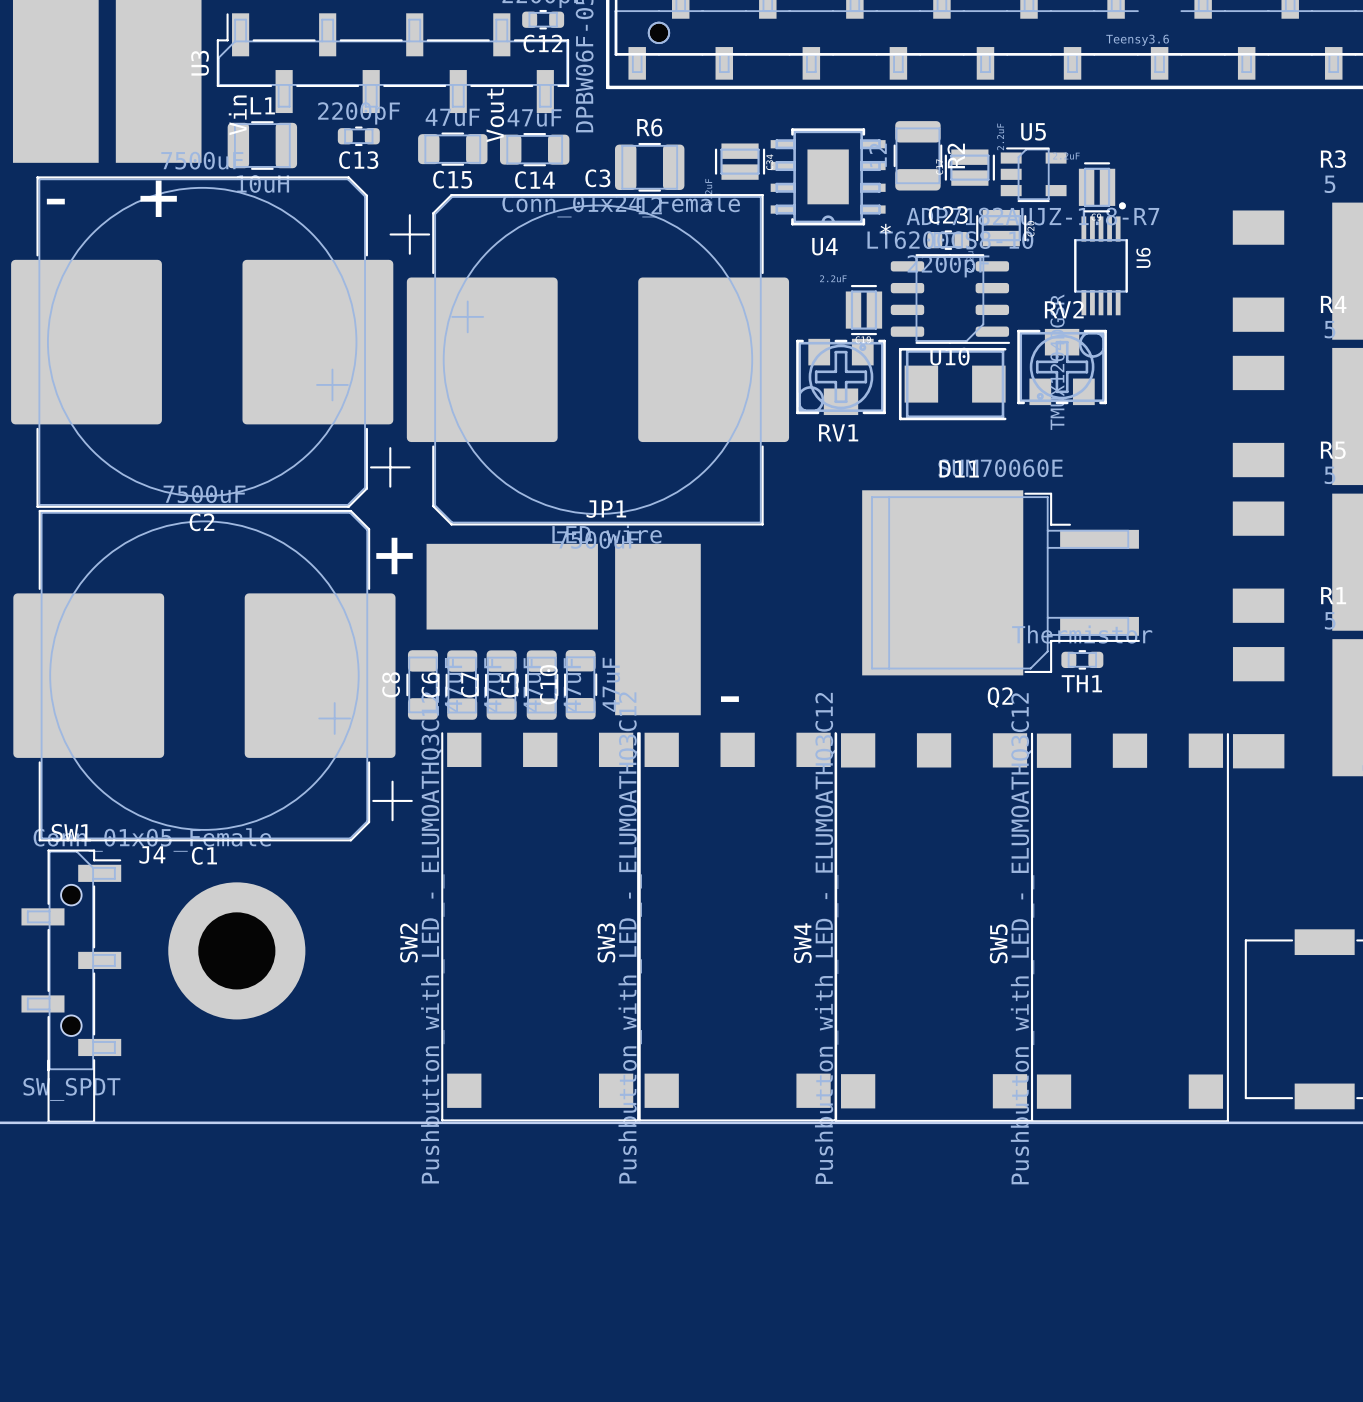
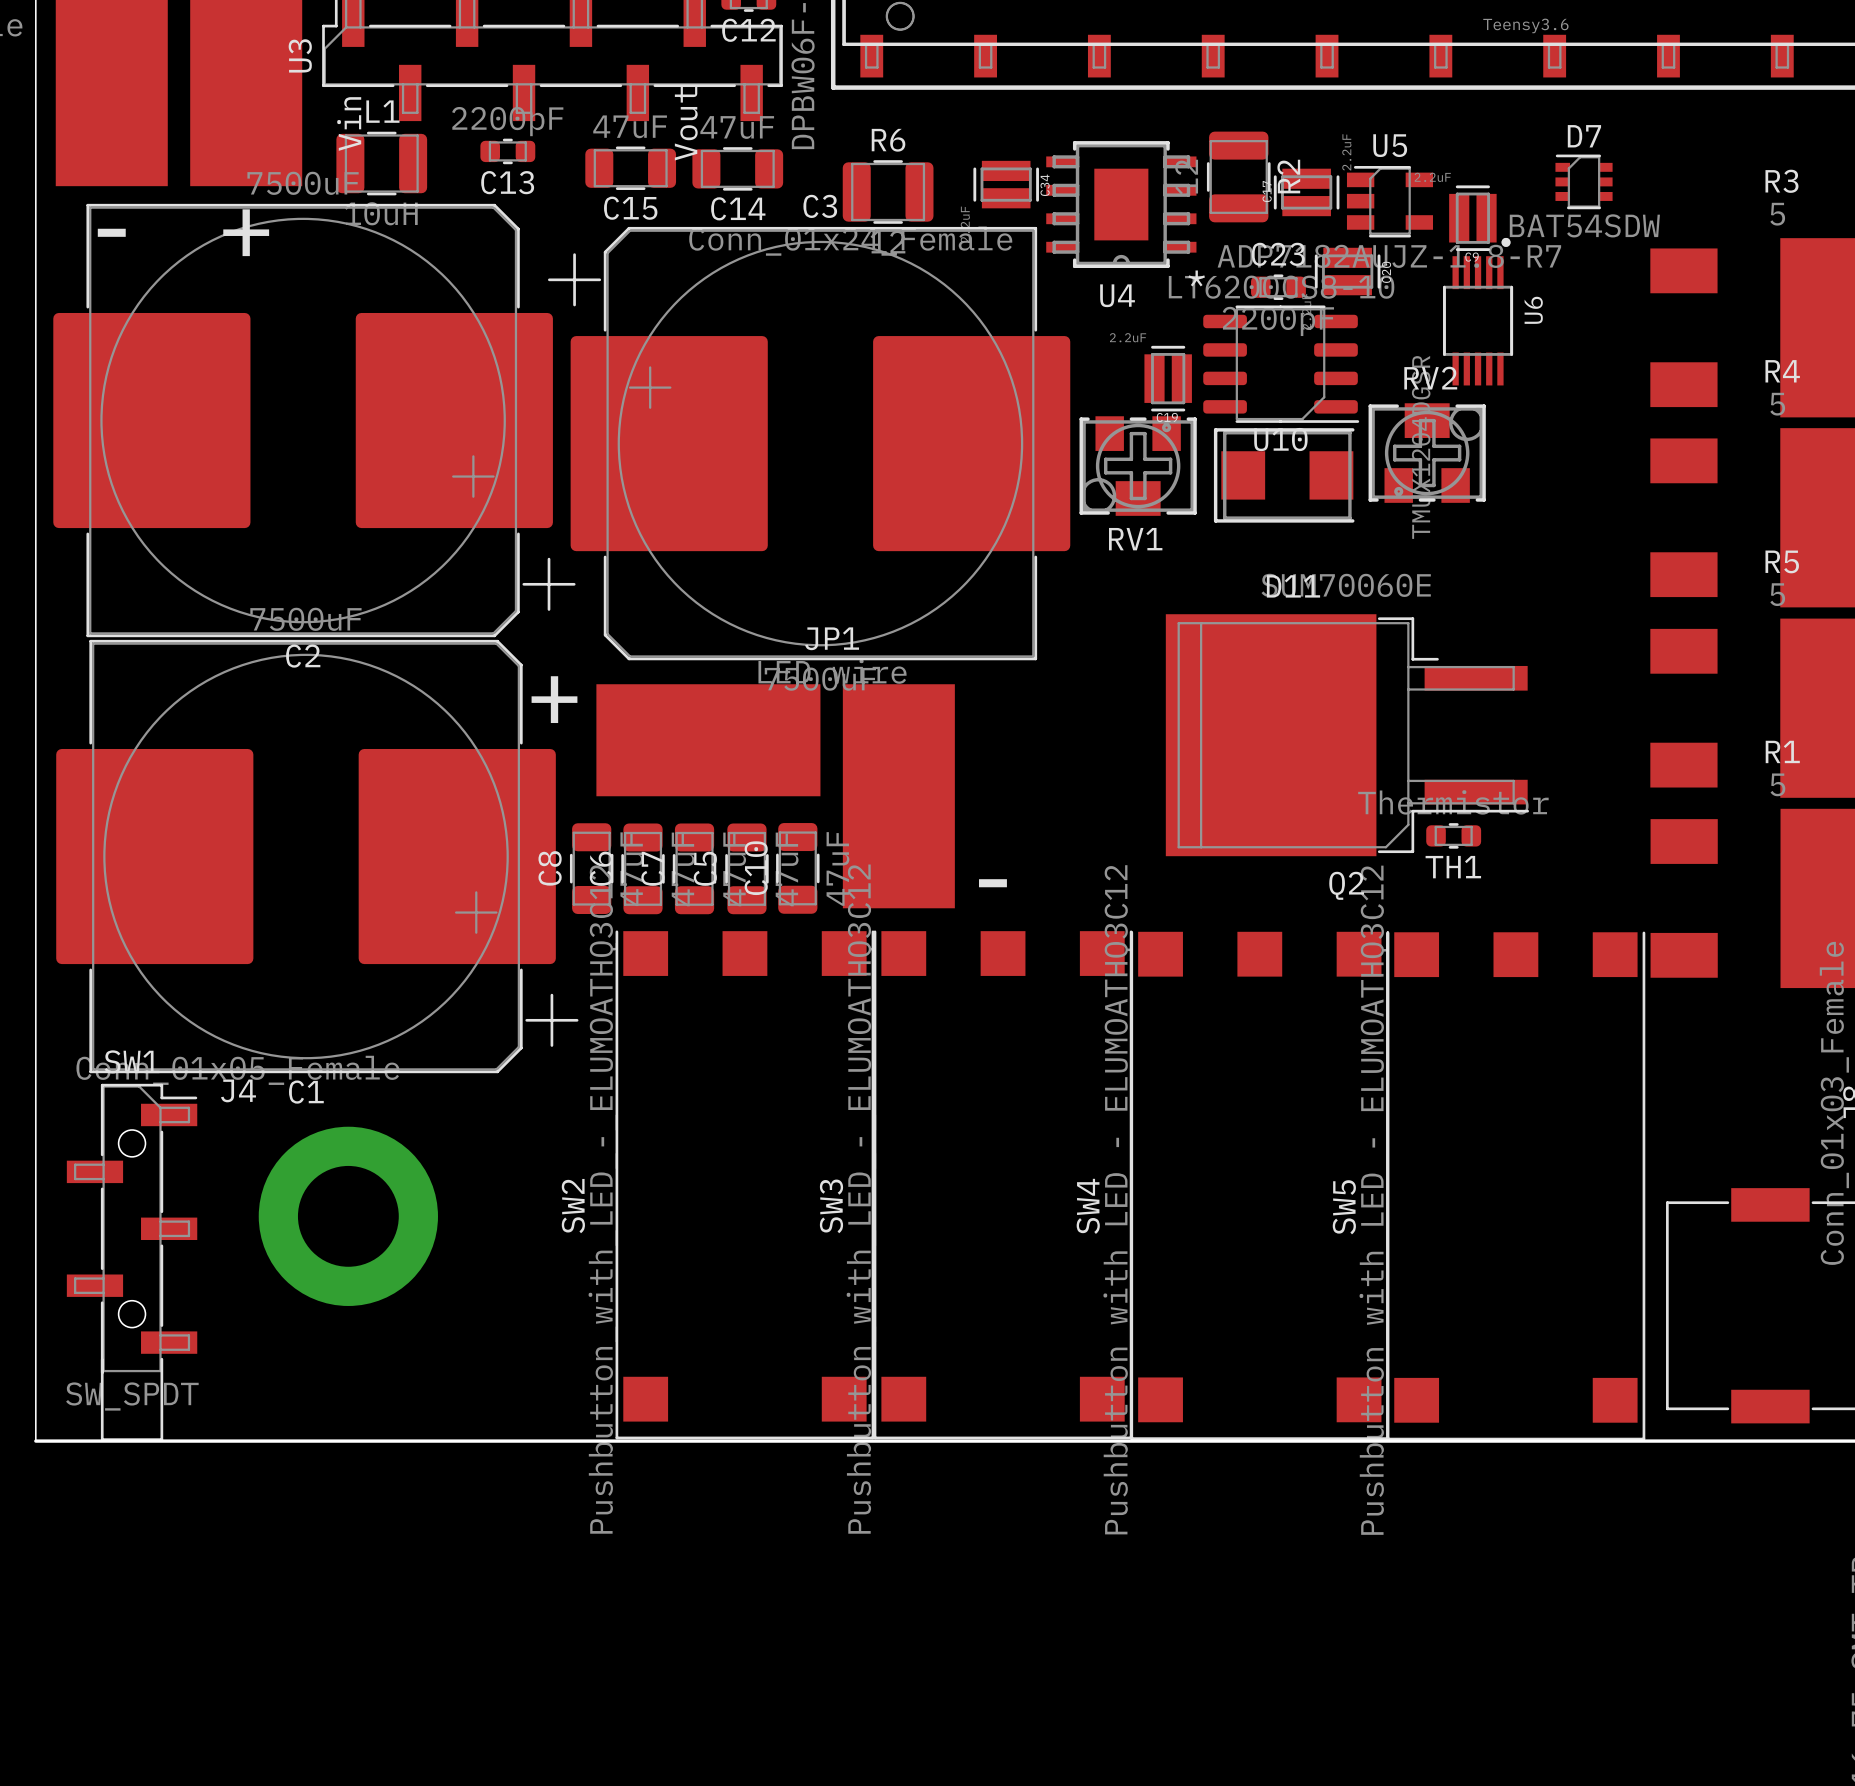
D7: none -> BAT54SDW (1584, 181)

